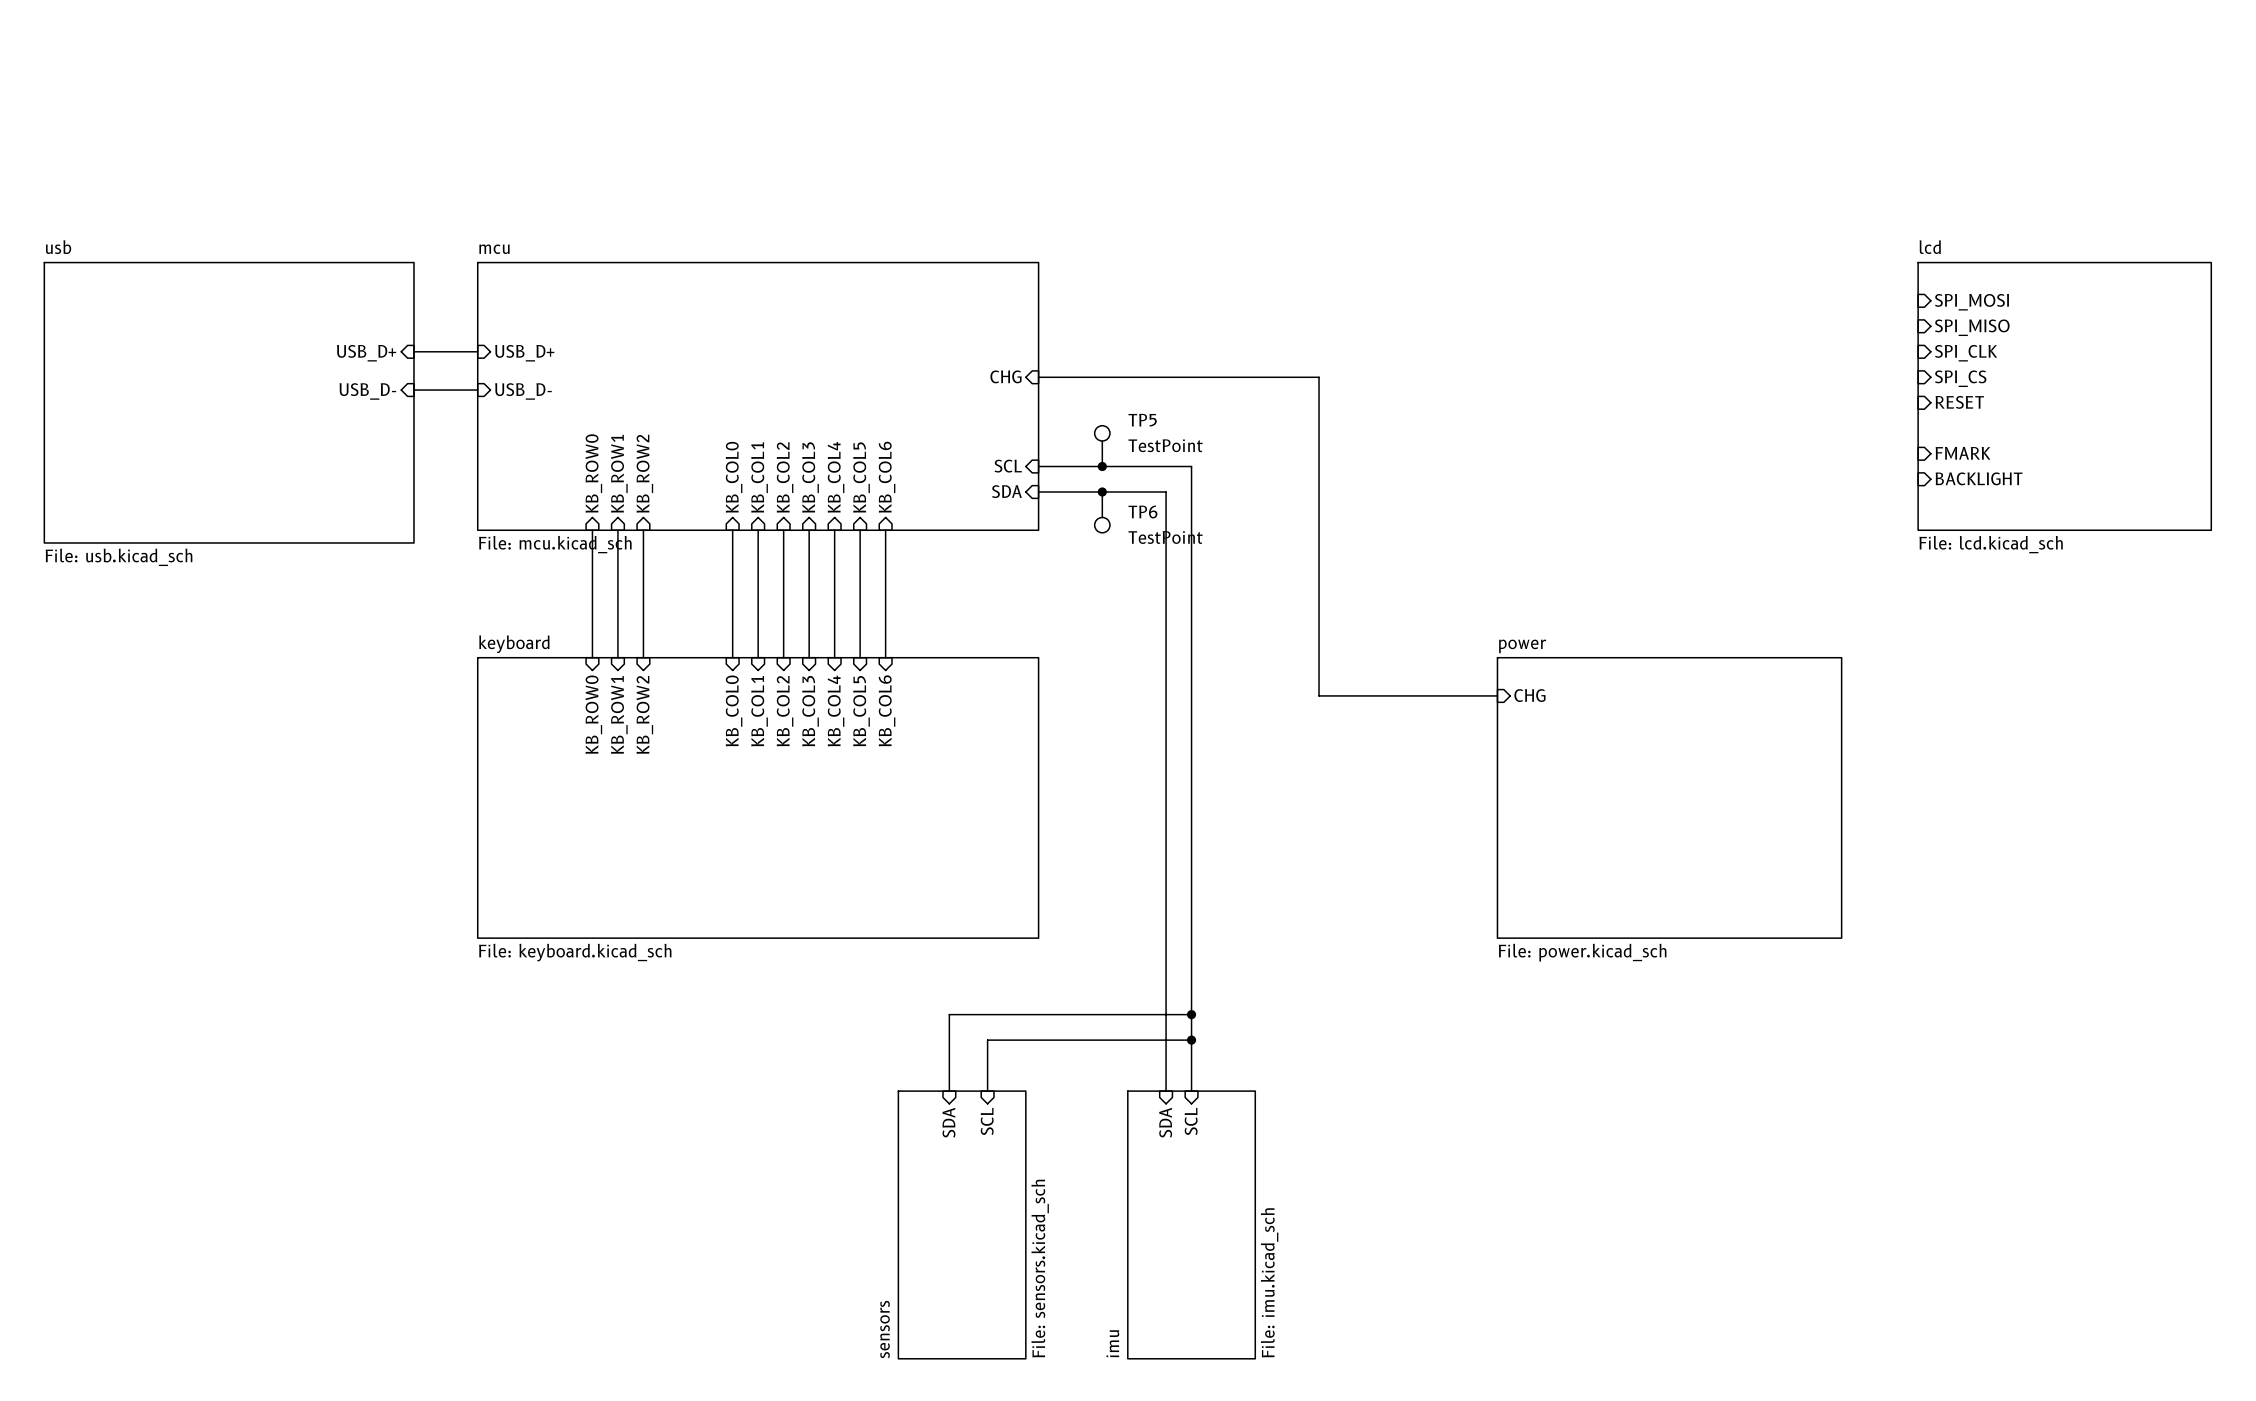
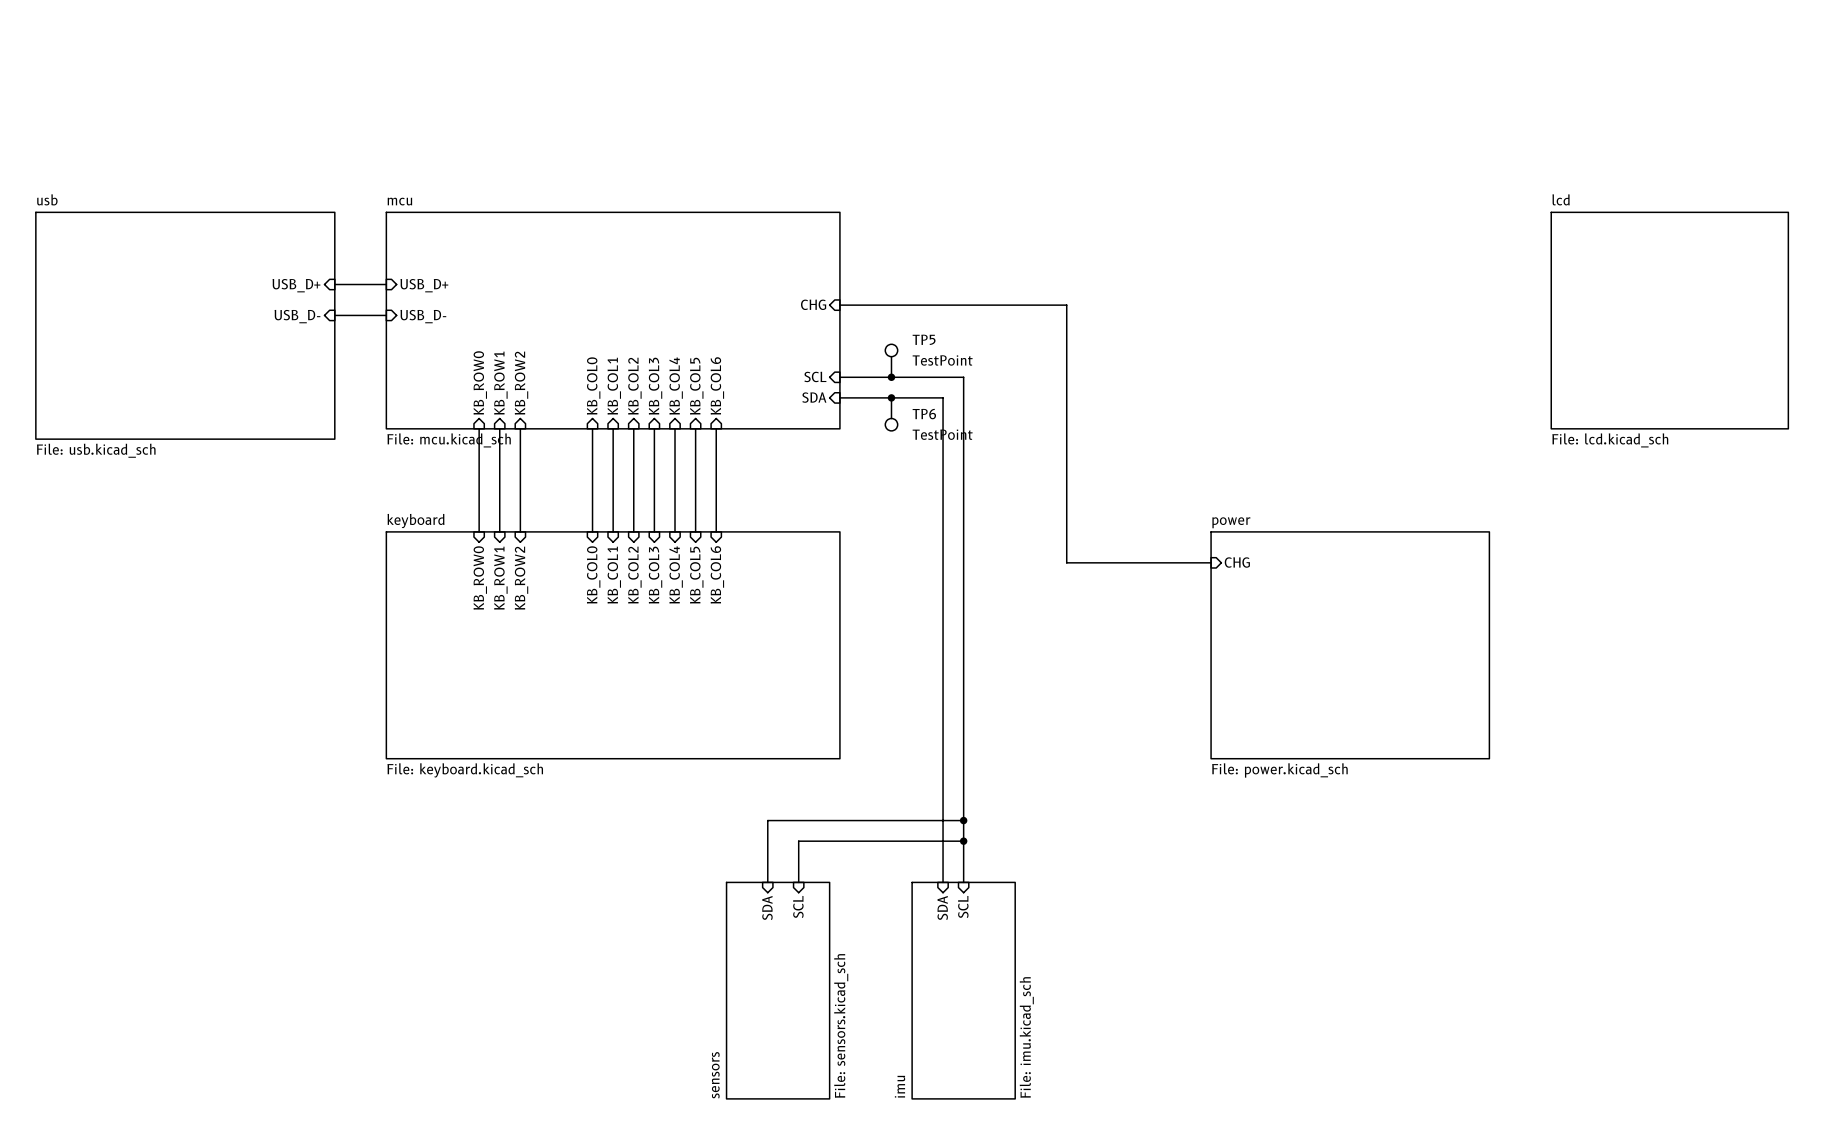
sheet pin: SPI_MOSI (1971, 302) -> none
sheet pin: SPI_MISO (1972, 327) -> none
sheet pin: SPI_CLK (1966, 353) -> none
sheet pin: SPI_CS (1960, 378) -> none
sheet pin: RESET (1959, 402) -> none
sheet pin: FMARK (1963, 453) -> none
sheet pin: BACKLIGHT (1979, 478) -> none

